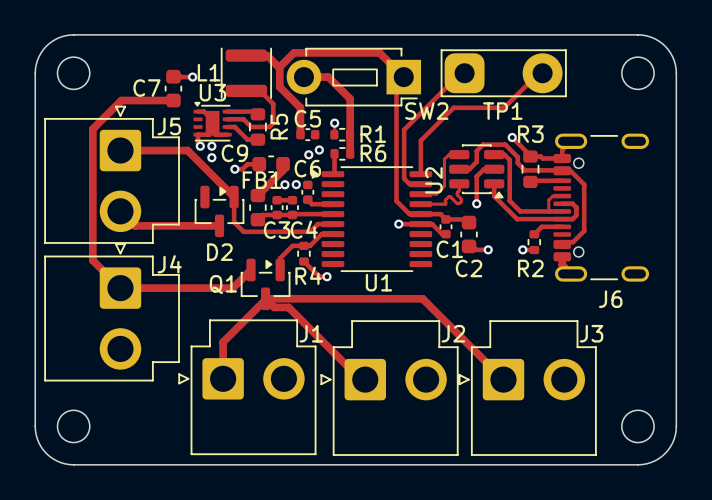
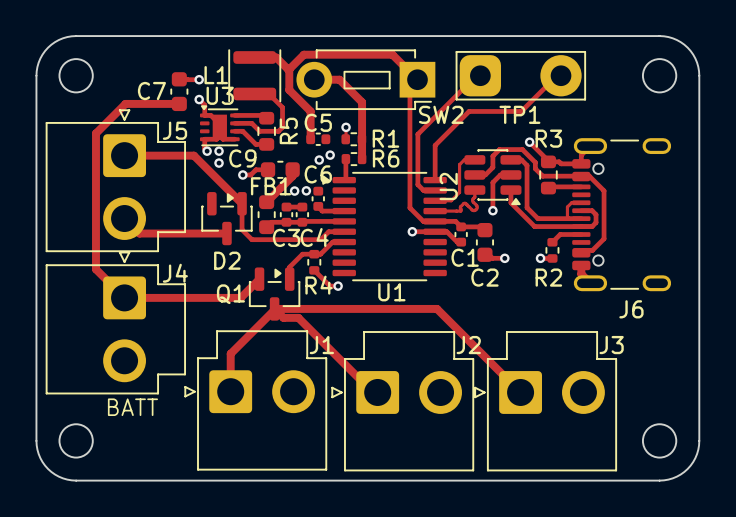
track: none -> (199, 99) (204, 105) (204, 115)
via: none -> (199, 99)
text: none -> BATT (132, 407)

